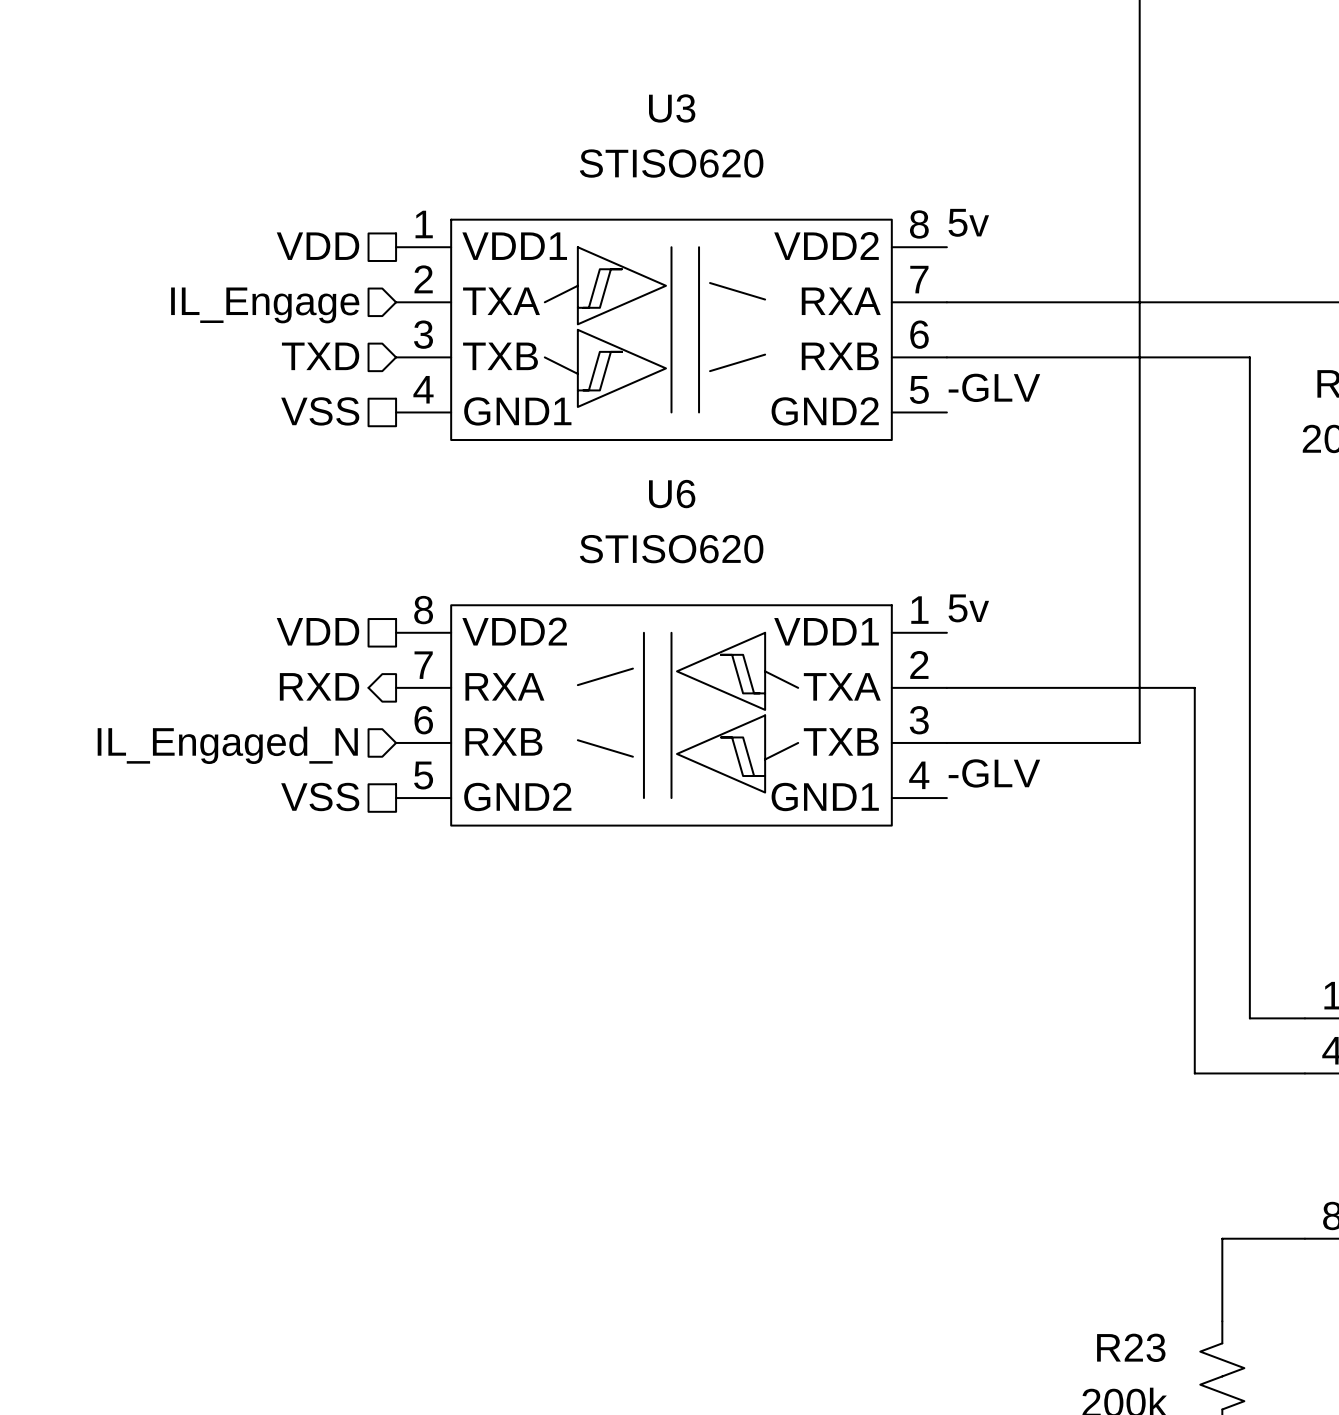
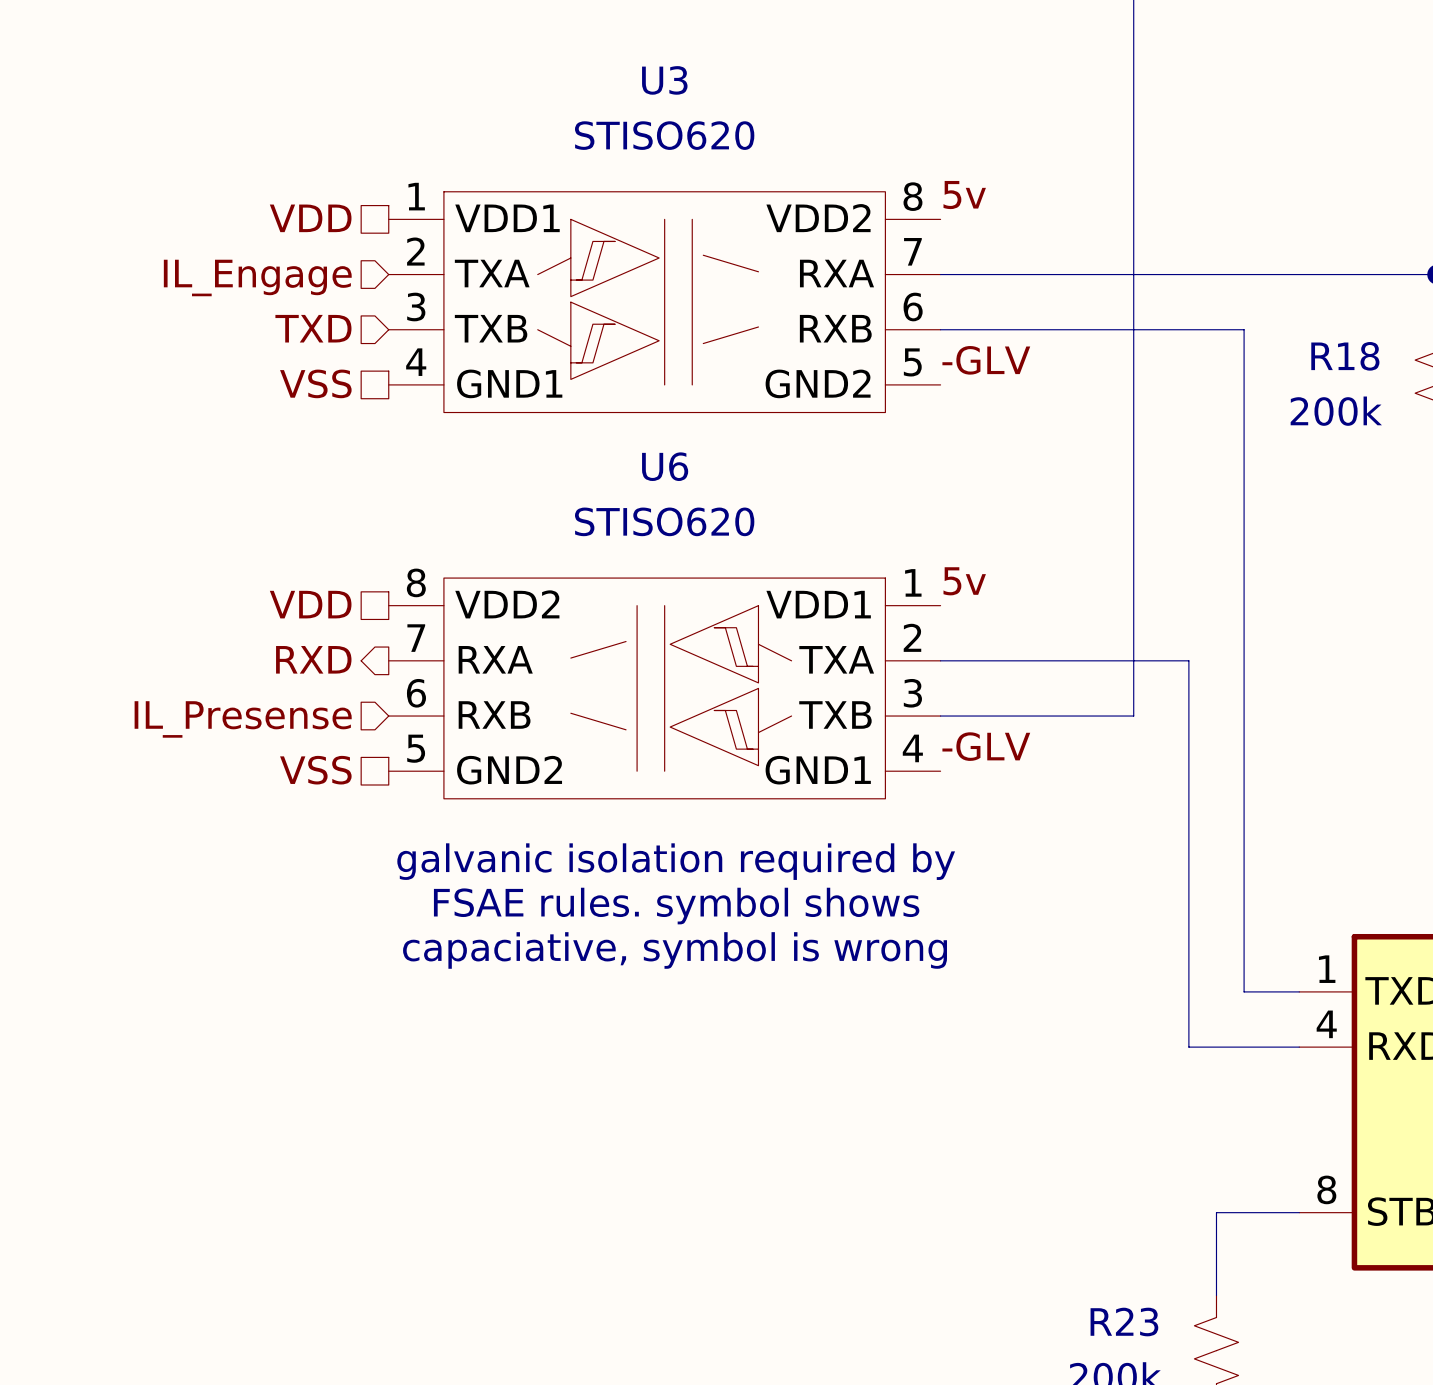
hierarchical label: IL_Engaged_N (227, 745) -> IL_Presense (243, 719)
text: none -> galvanic isolation required by (676, 861)
text: none -> FSAE rules. symbol shows (676, 906)
text: none -> capaciative, symbol is wrong (675, 950)

